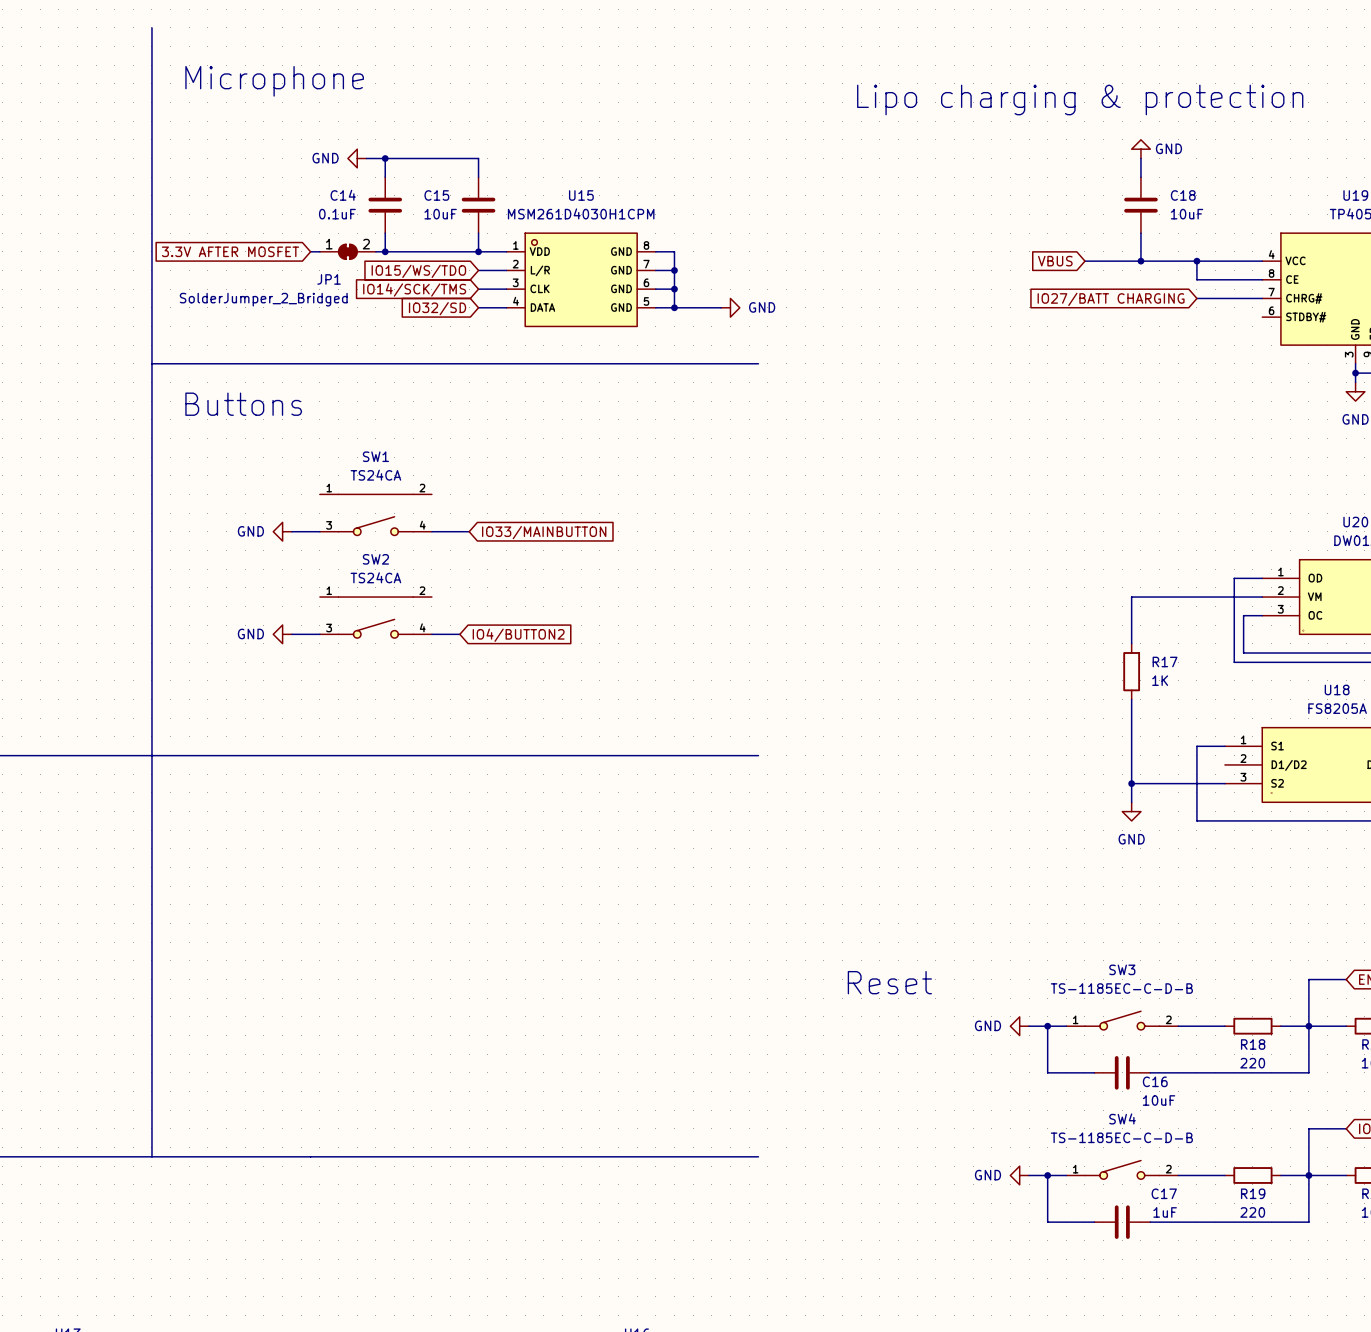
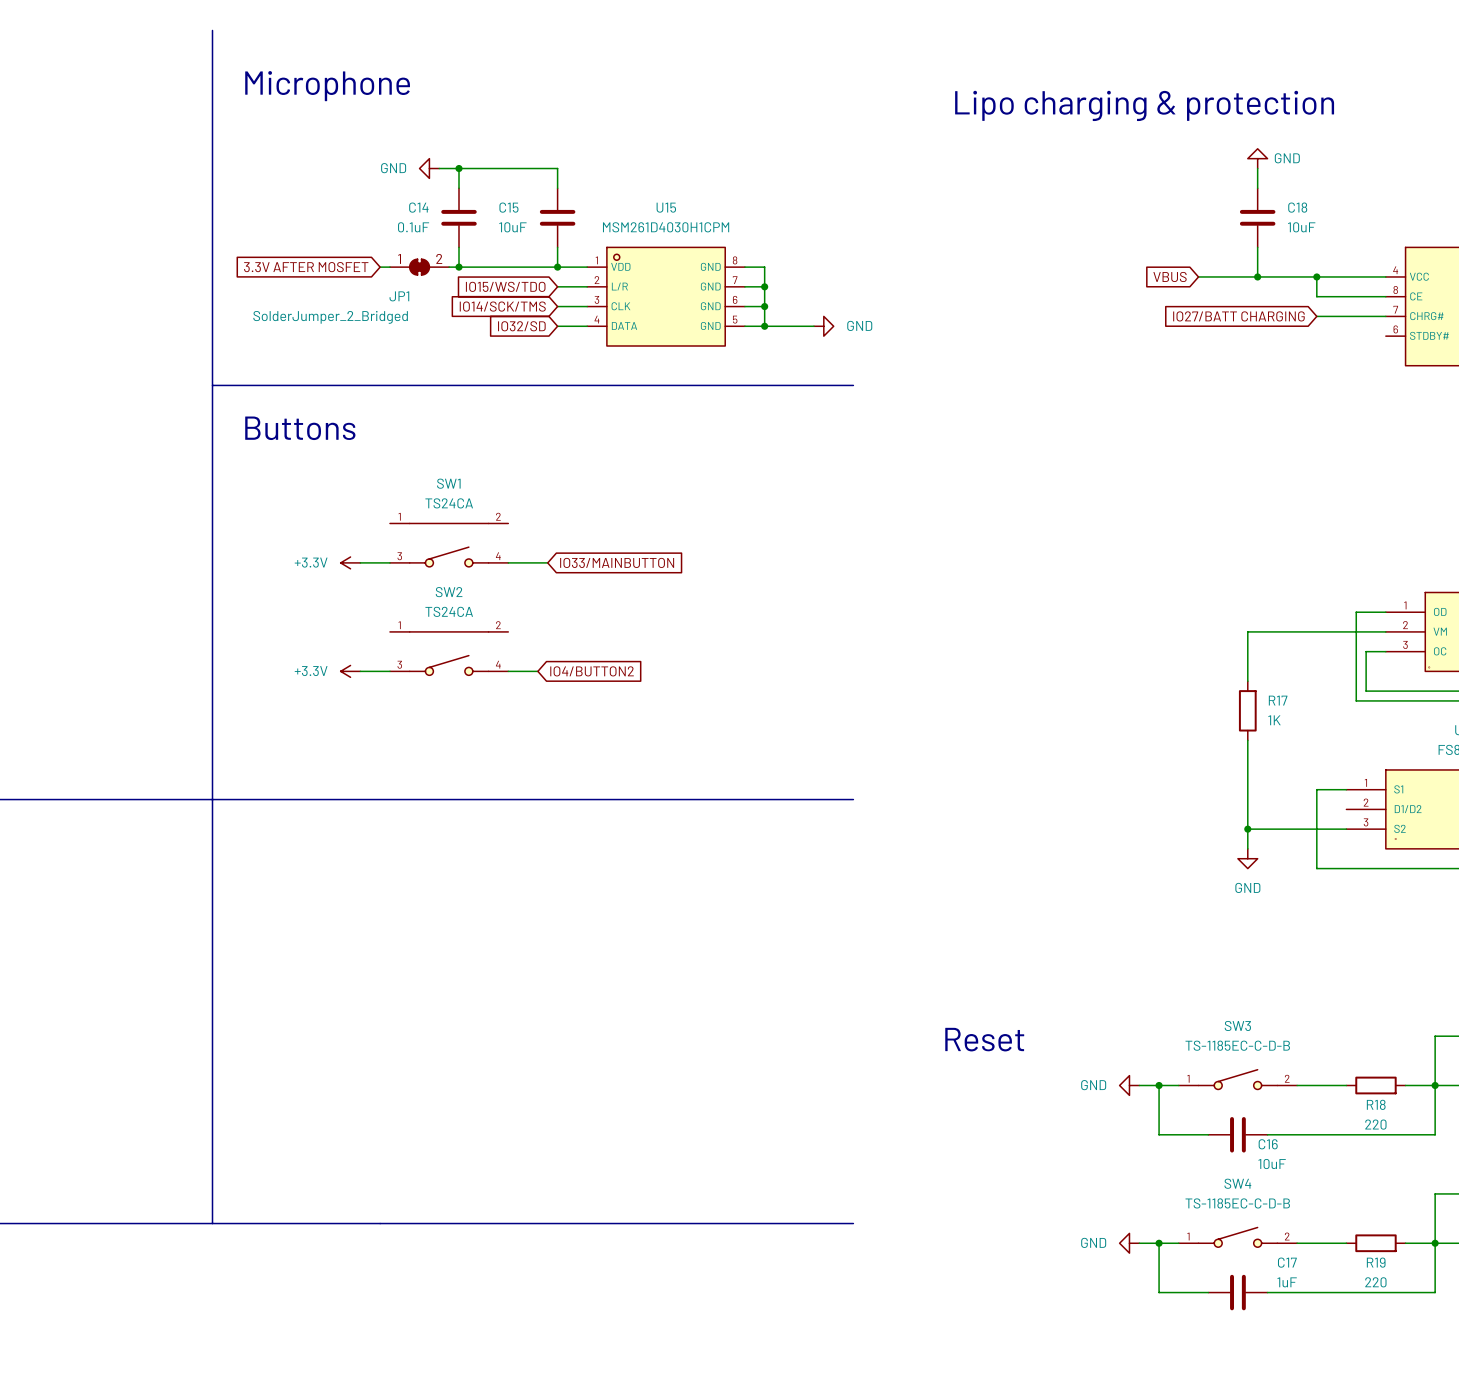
power symbol: GND (282, 531) -> +3.3V (350, 562)
power symbol: GND (282, 634) -> +3.3V (350, 671)

